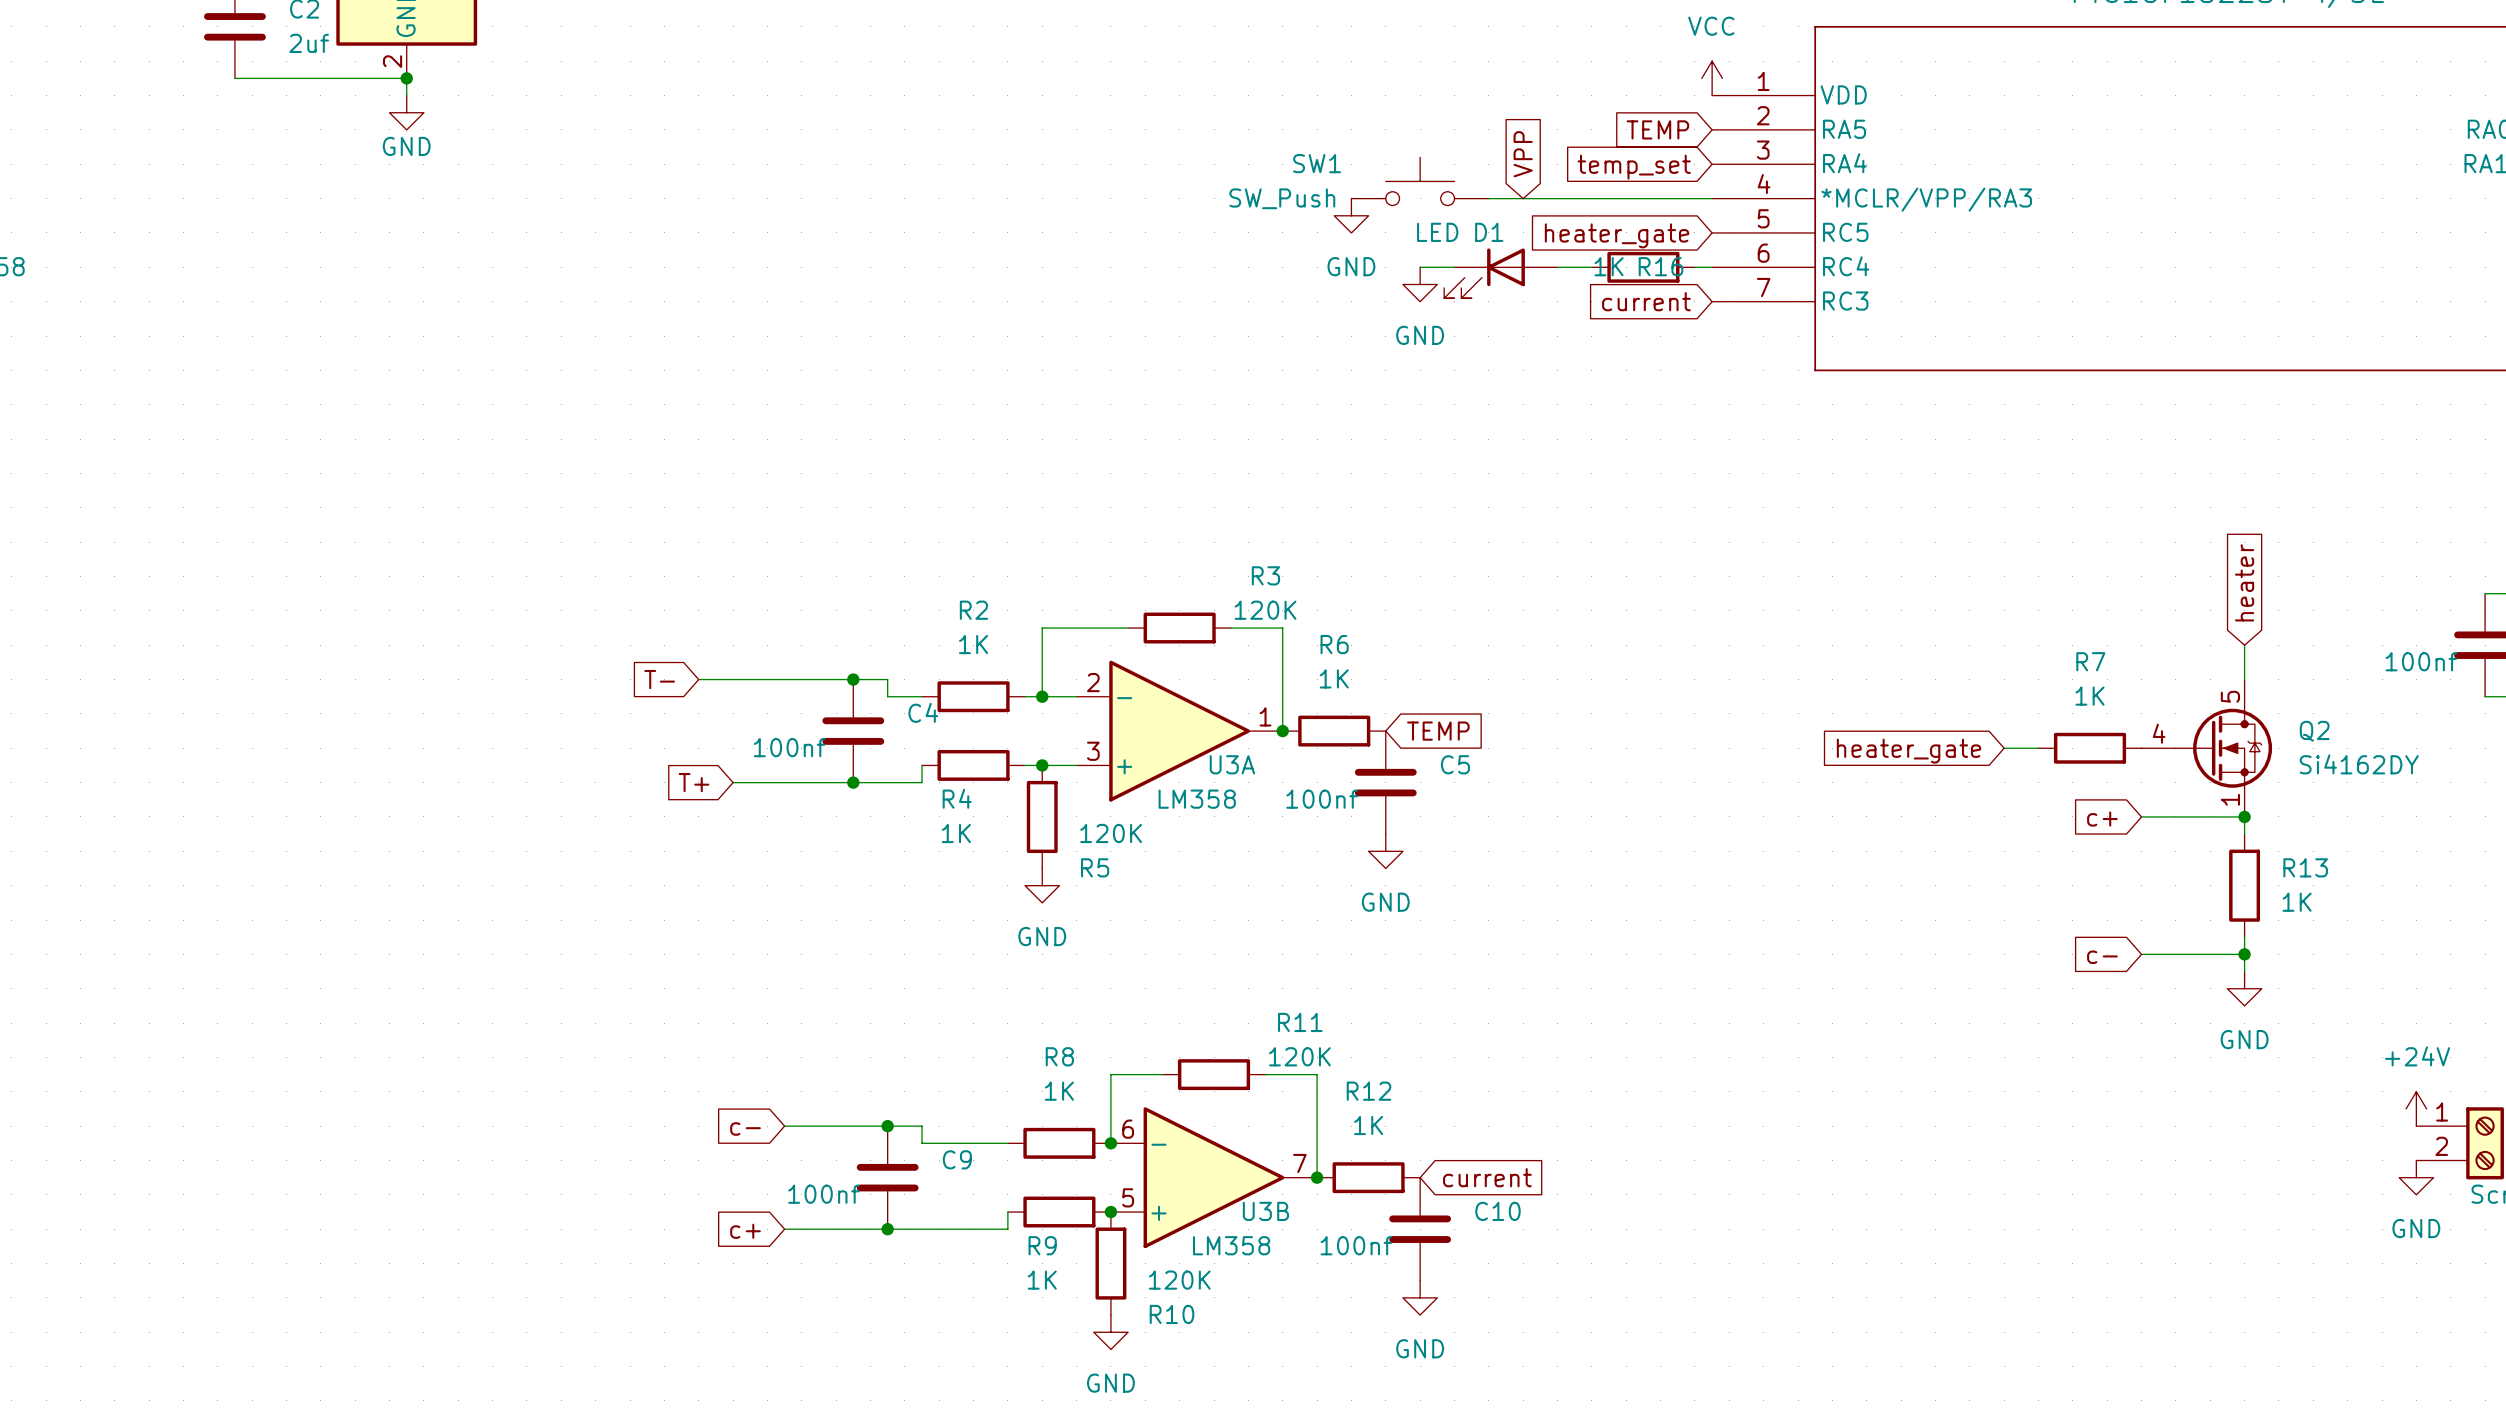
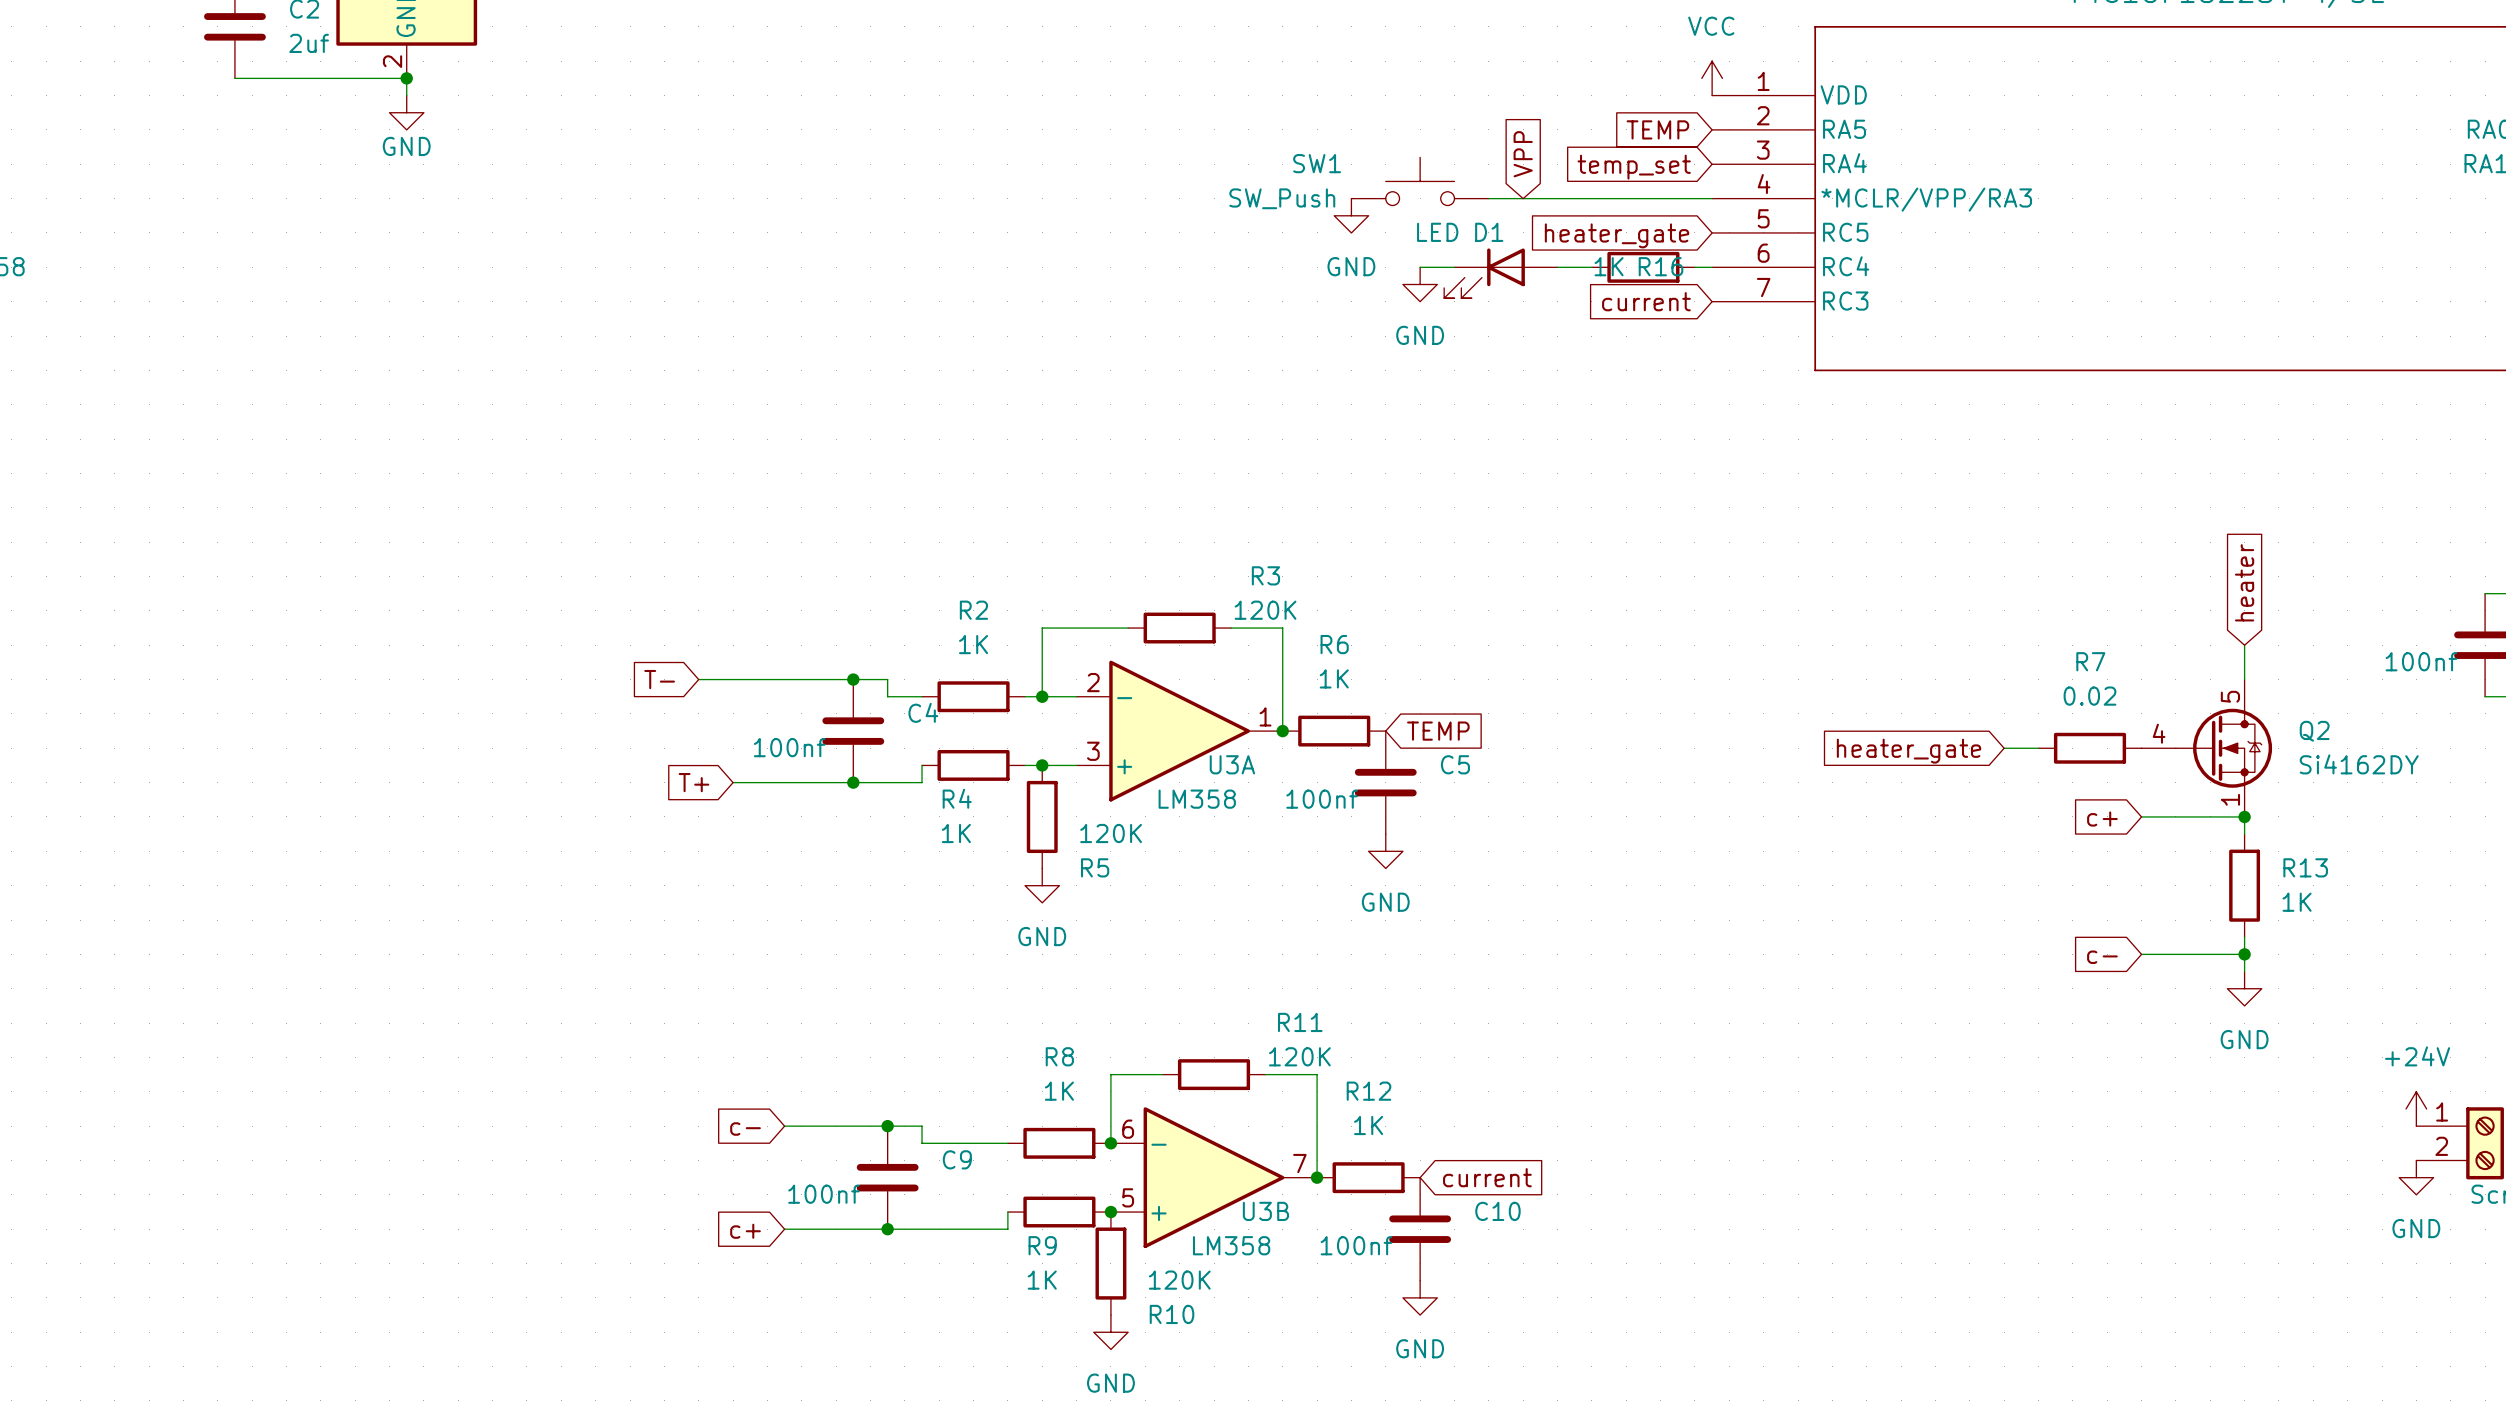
R7 value: 1K (2090, 696) -> 0.02 (2090, 696)

